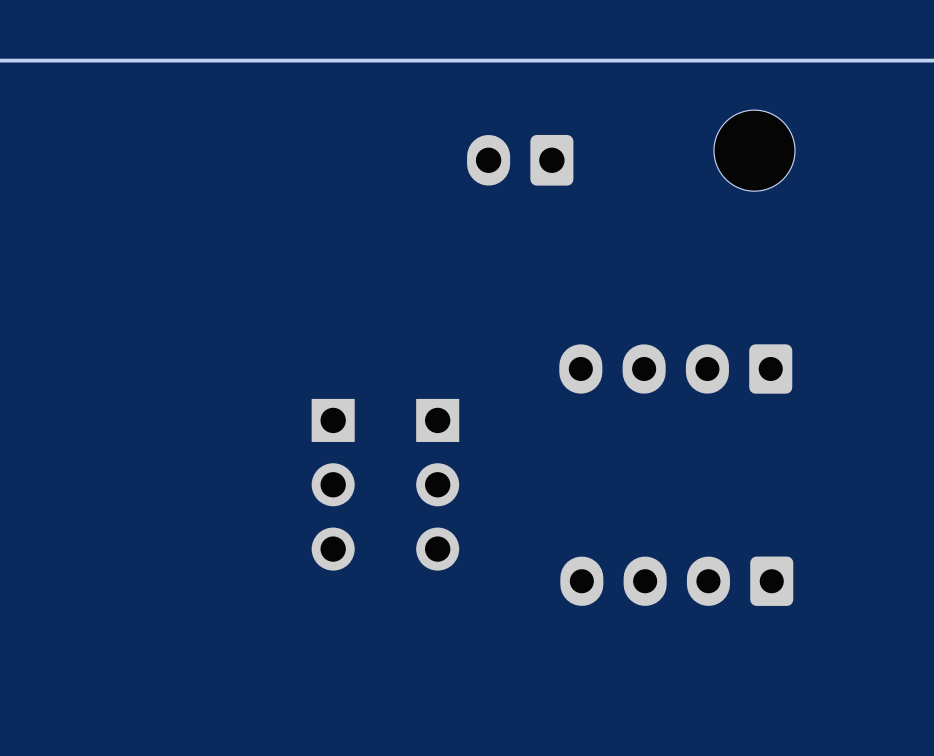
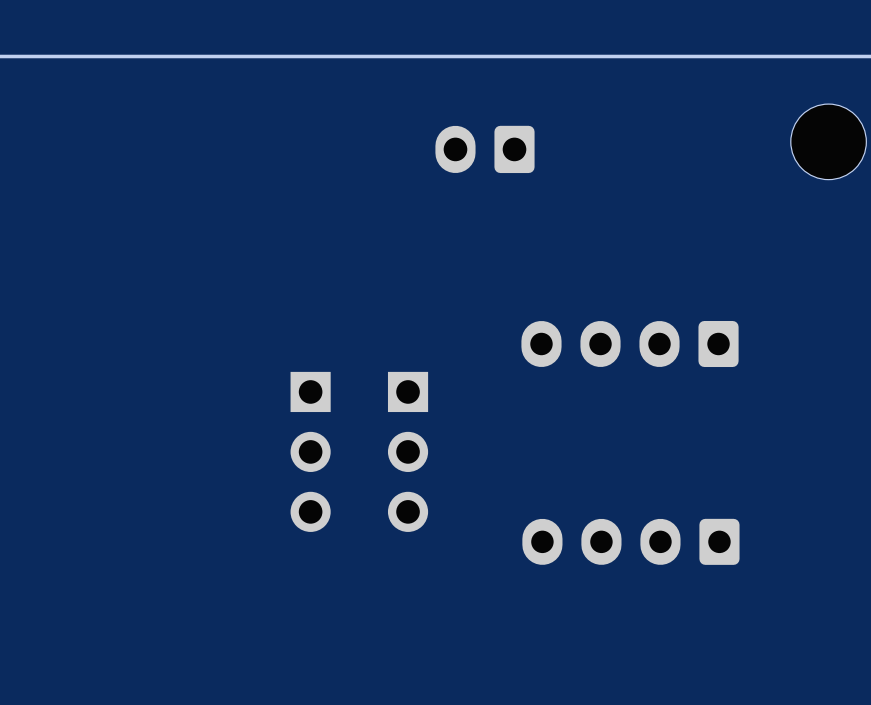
part position: (754, 150) -> (828, 141)

